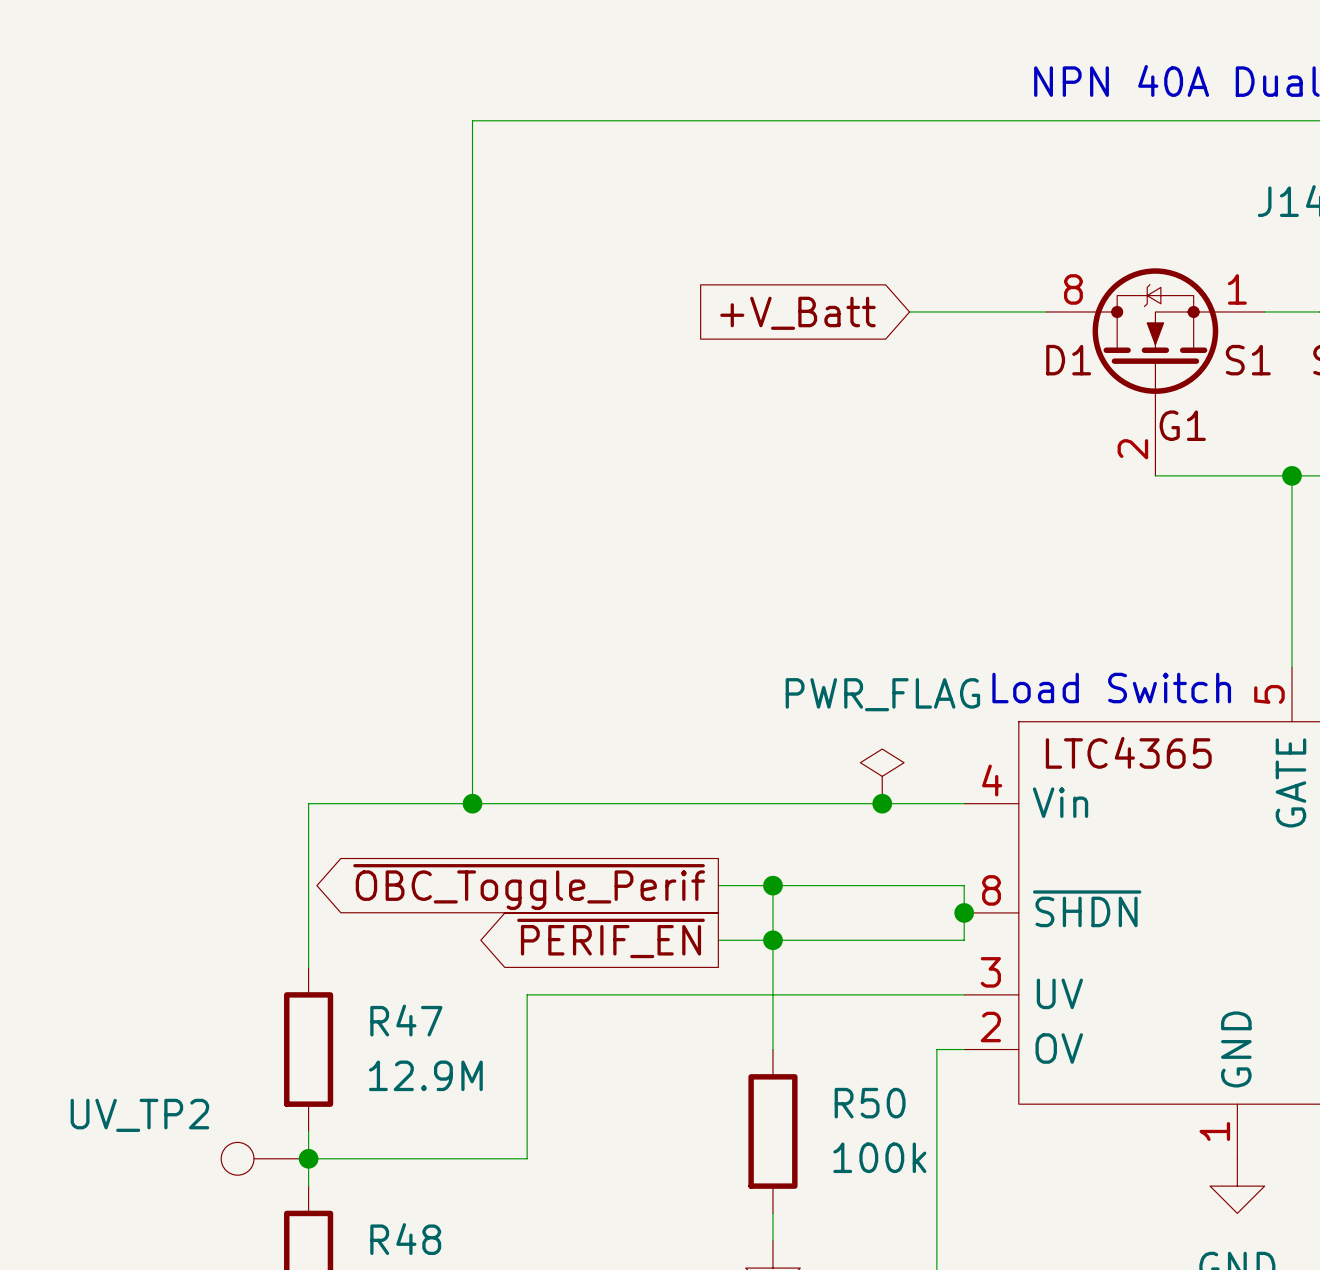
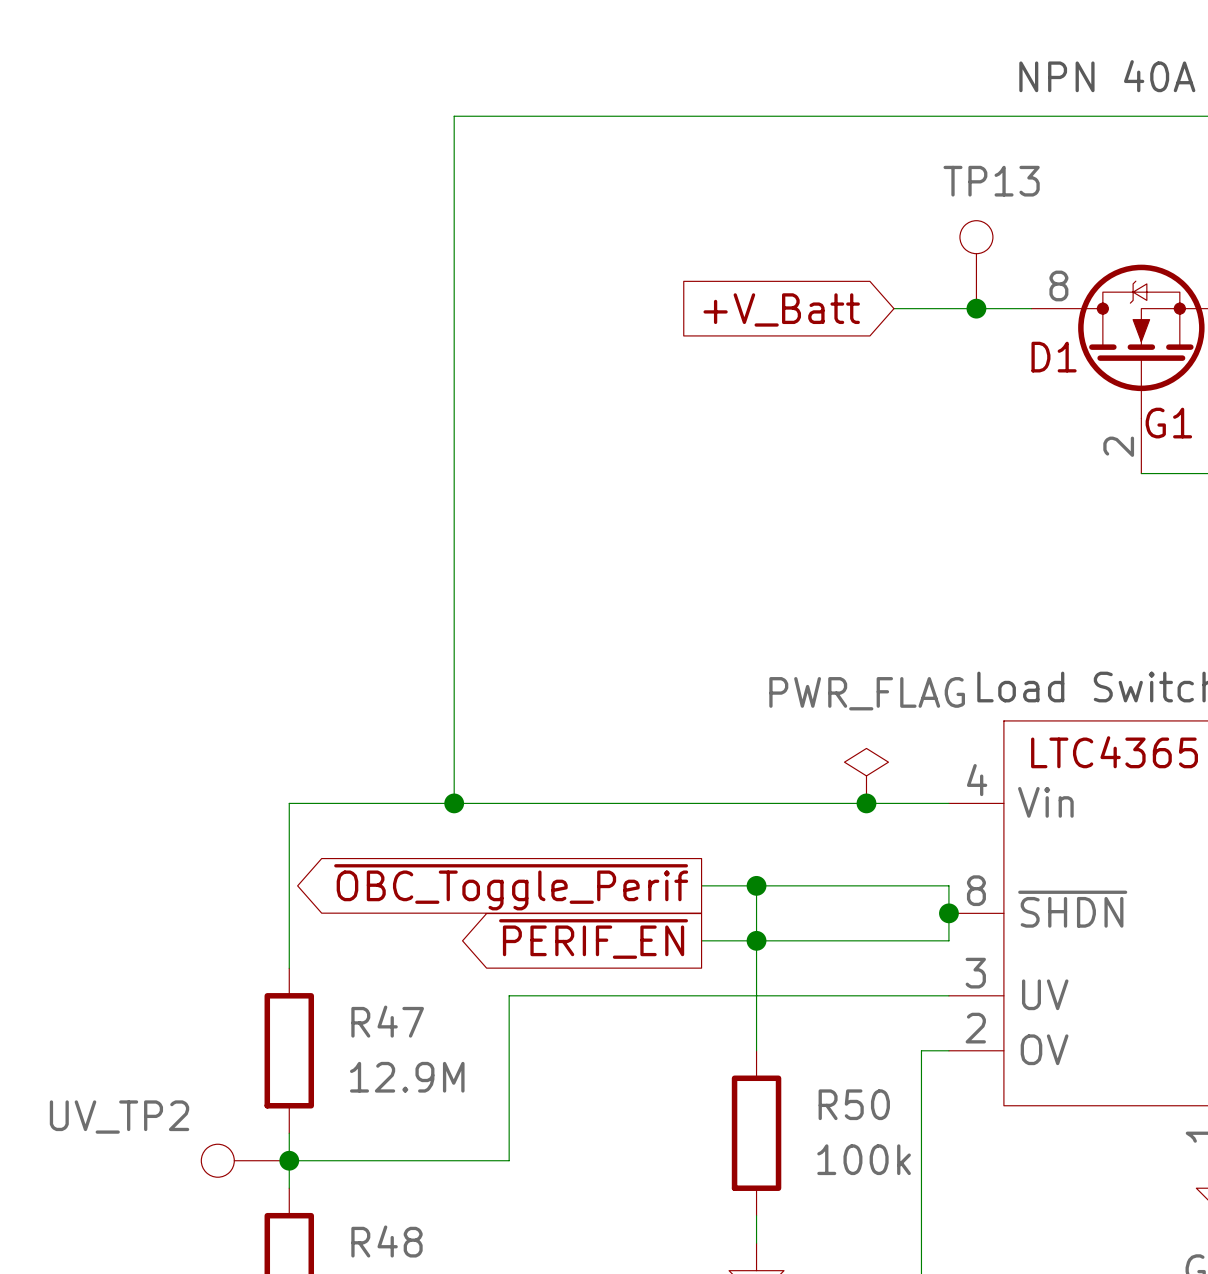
TP13: none -> (976, 264)
junction: none -> (976, 308)

